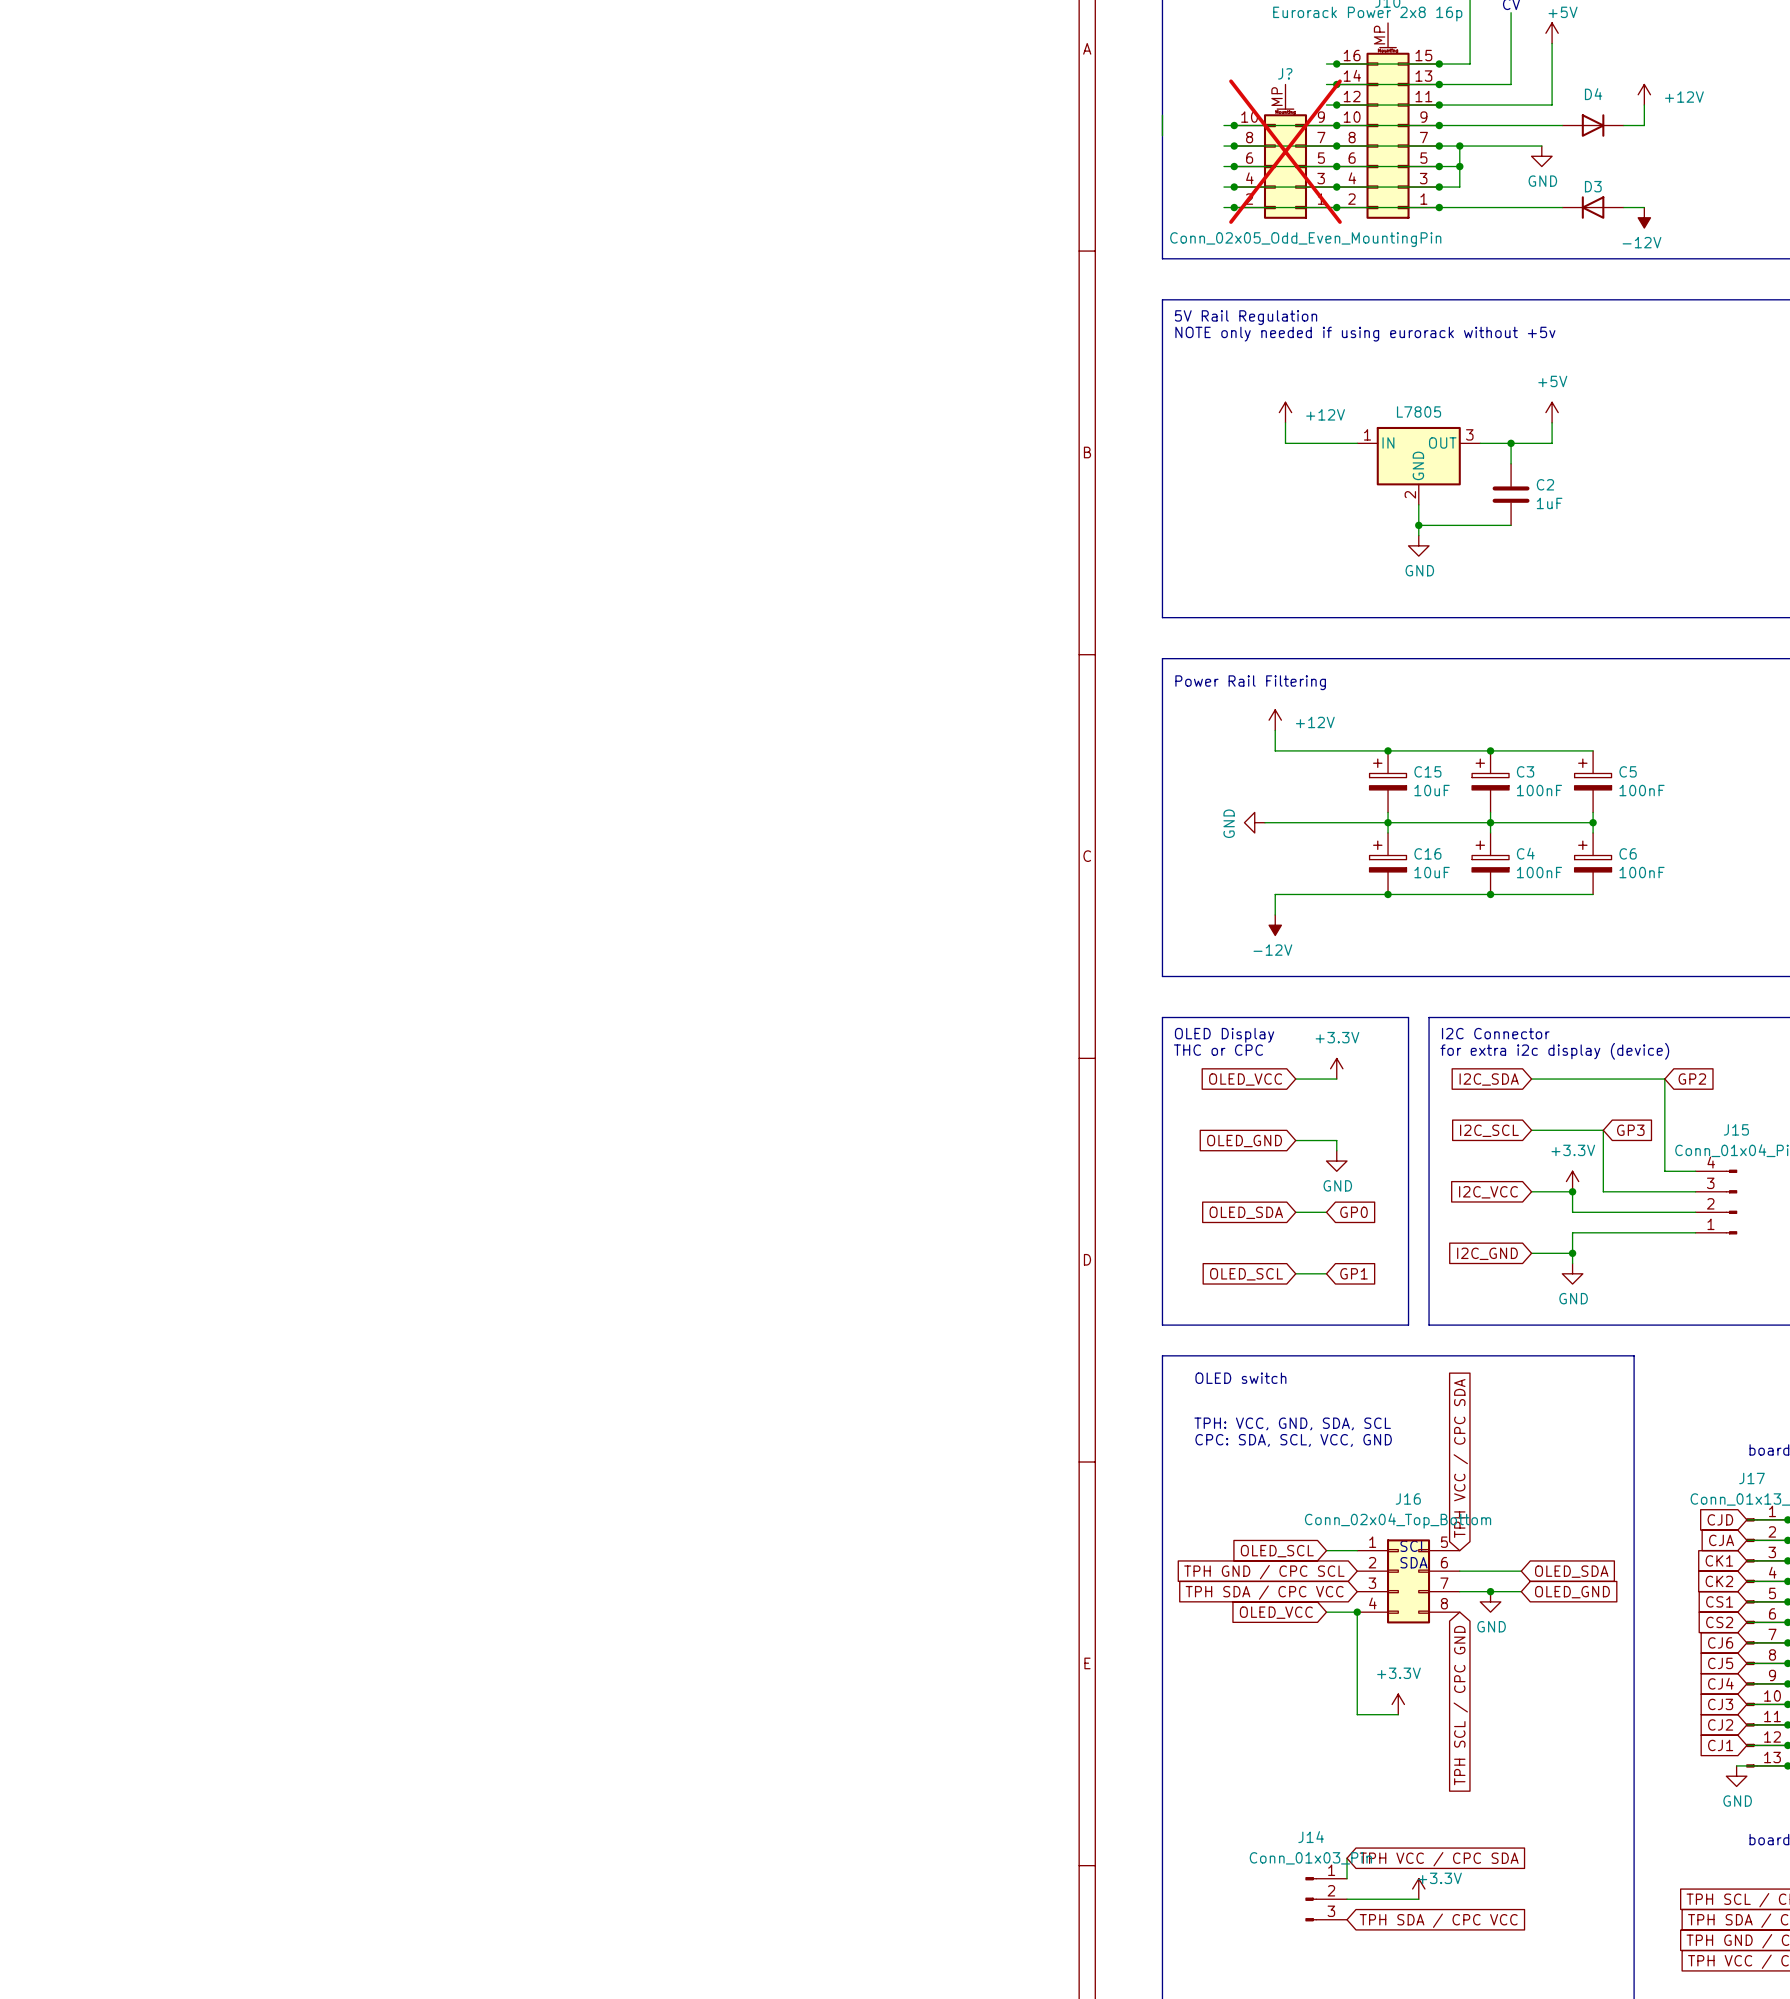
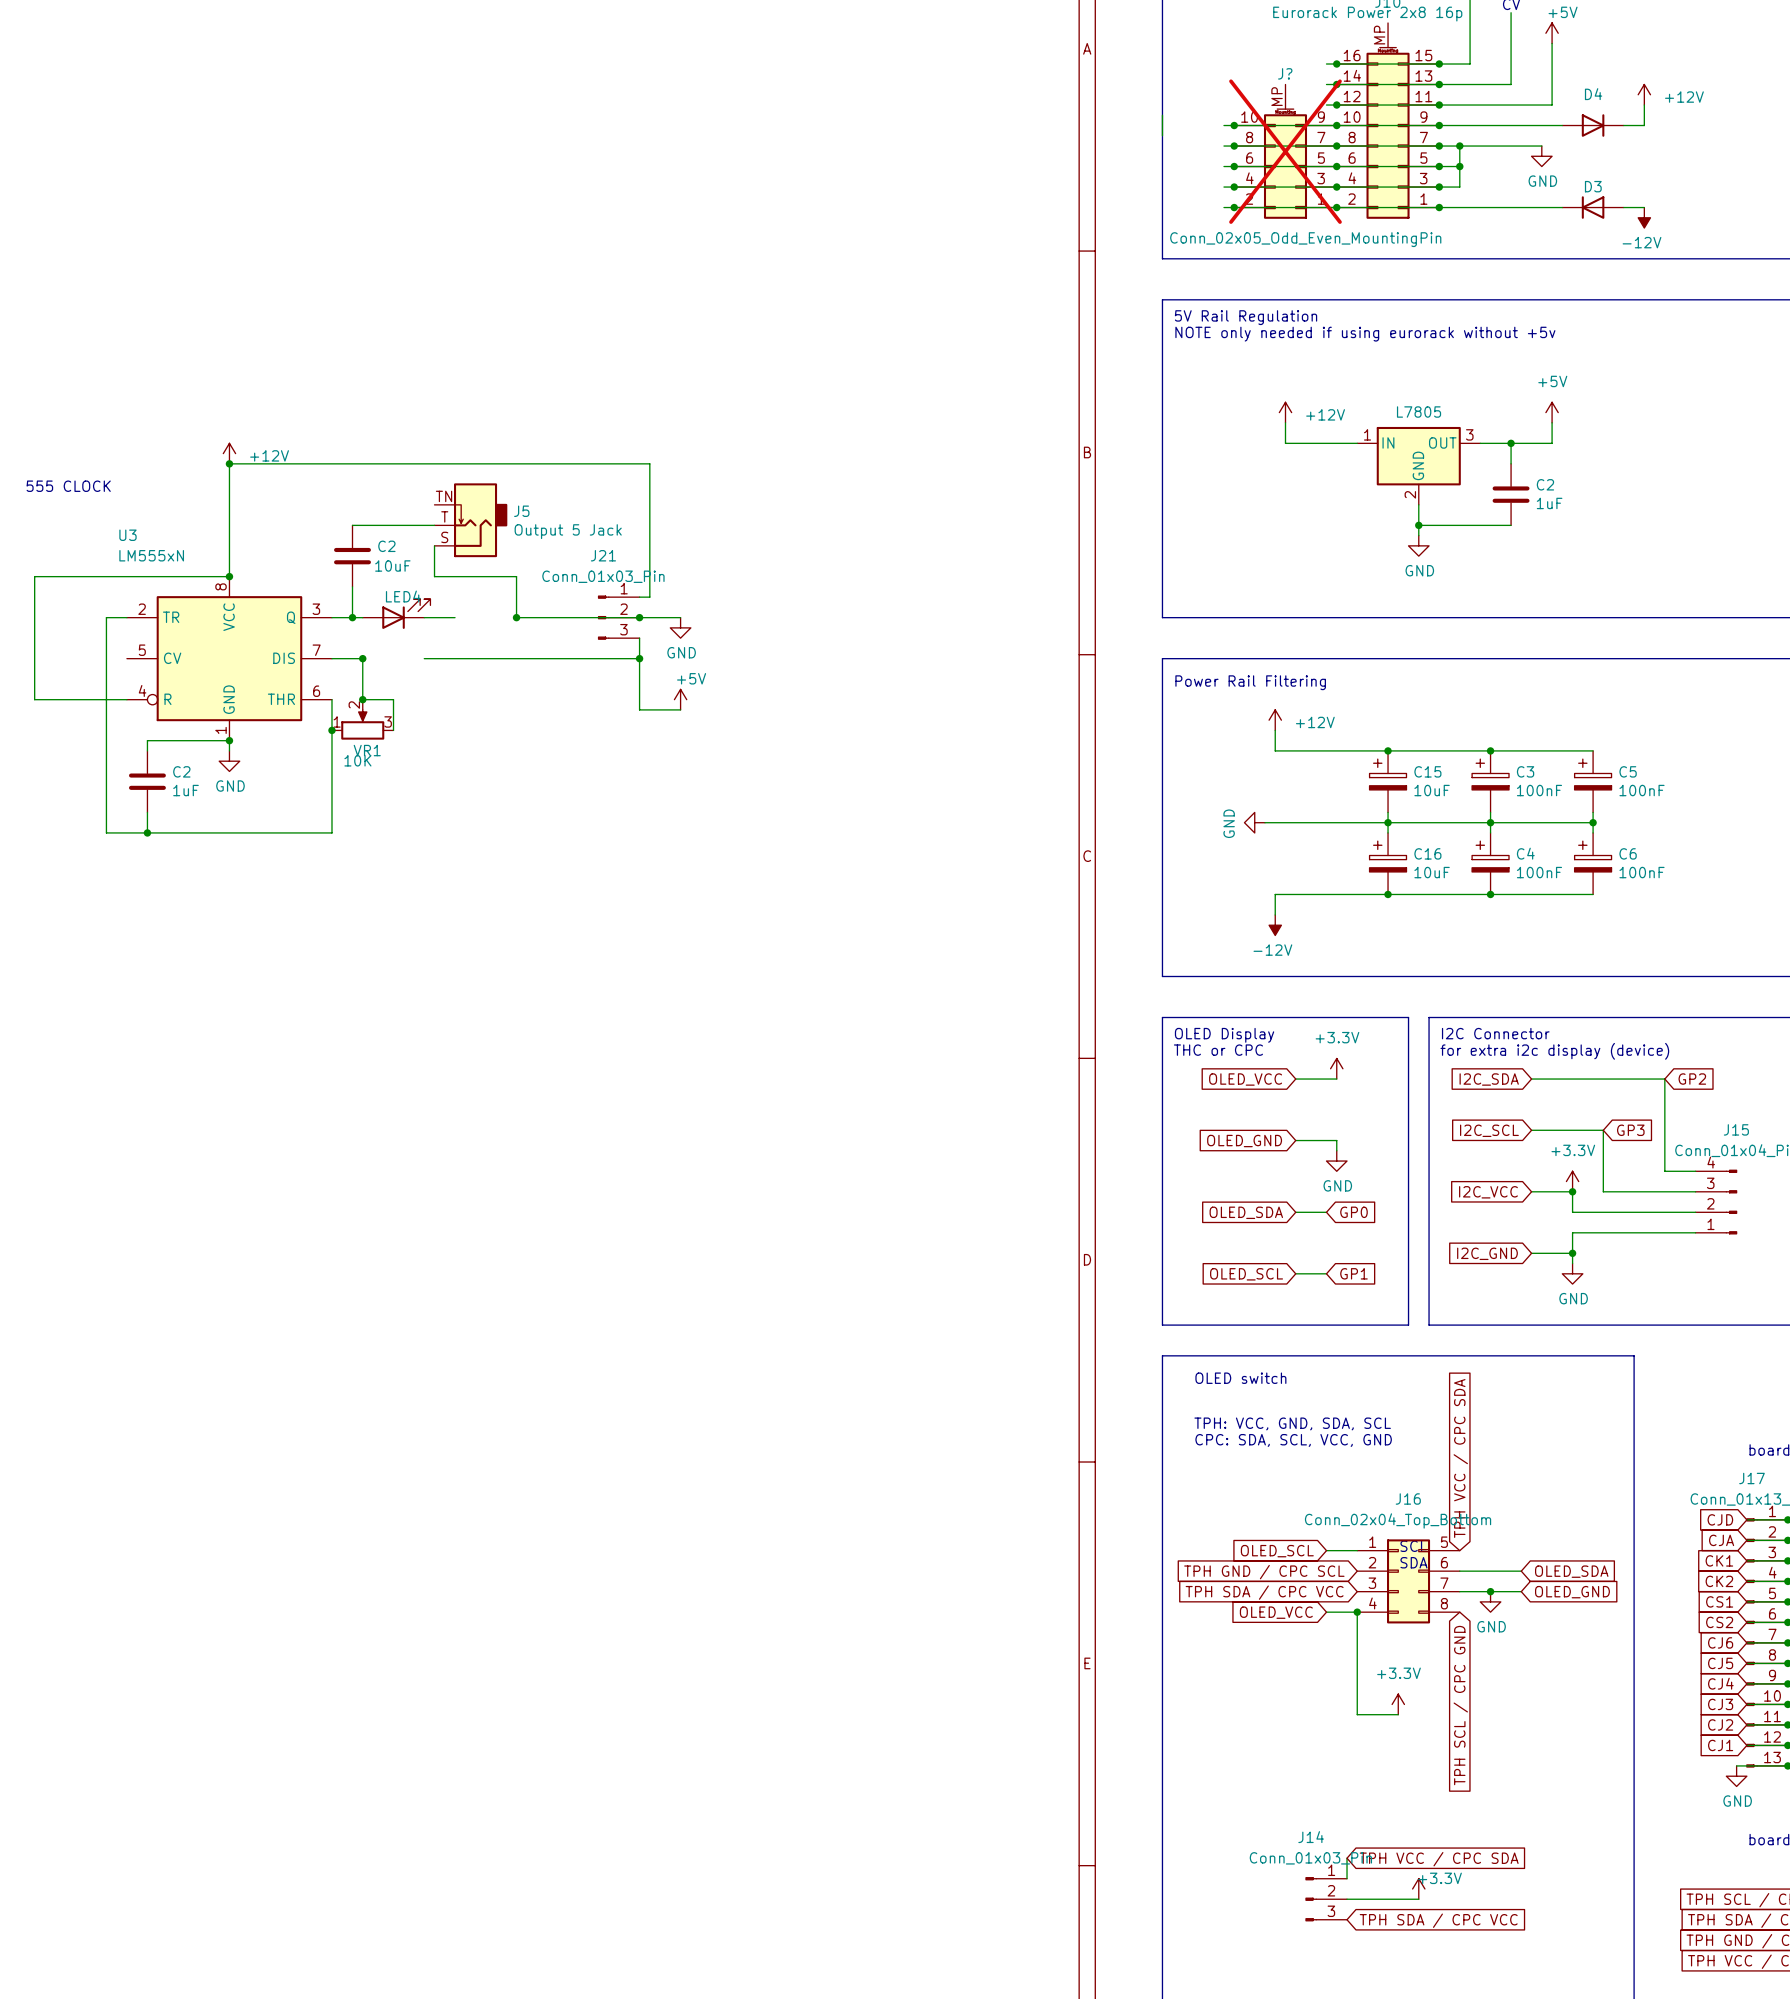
part: none -> +12V (229, 453)
junction: none -> (229, 463)
text: none -> 555 CLOCK (68, 486)
J5: none -> Output 5 Jack (470, 520)
wire: none -> (352, 525) (434, 525)
wire: none -> (434, 545) (434, 576) (516, 576) (516, 617) (680, 617)
C2: none -> 10uF (352, 556)
junction: none -> (229, 576)
wire: none -> (352, 586) (352, 617)
wire: none -> (639, 597) (649, 597) (649, 463) (229, 463) (229, 576) (34, 576) (34, 699) (126, 699)
LED4: none -> (396, 614)
wire: none -> (126, 617) (106, 617) (106, 832) (331, 832) (331, 699)
wire: none -> (331, 617) (362, 617)
junction: none -> (352, 617)
wire: none -> (424, 617) (455, 617)
junction: none -> (516, 617)
J21: none -> Conn_01x03_Pin (618, 617)
junction: none -> (639, 617)
power symbol: none -> GND (680, 627)
wire: none -> (639, 638) (639, 709) (680, 709)
U3: none -> LM555xN (229, 658)
wire: none -> (331, 658) (362, 658) (362, 699) (393, 699) (393, 730)
junction: none -> (362, 658)
wire: none -> (424, 658) (639, 658)
junction: none -> (639, 658)
junction: none -> (362, 699)
power symbol: none -> +5V (680, 699)
VR1: none -> 10K (362, 719)
junction: none -> (331, 730)
junction: none -> (229, 740)
wire: none -> (147, 750) (147, 740) (229, 740) (229, 750)
power symbol: none -> GND (229, 761)
C2: none -> 1uF (147, 781)
wire: none -> (147, 812) (147, 832)
junction: none -> (147, 832)

